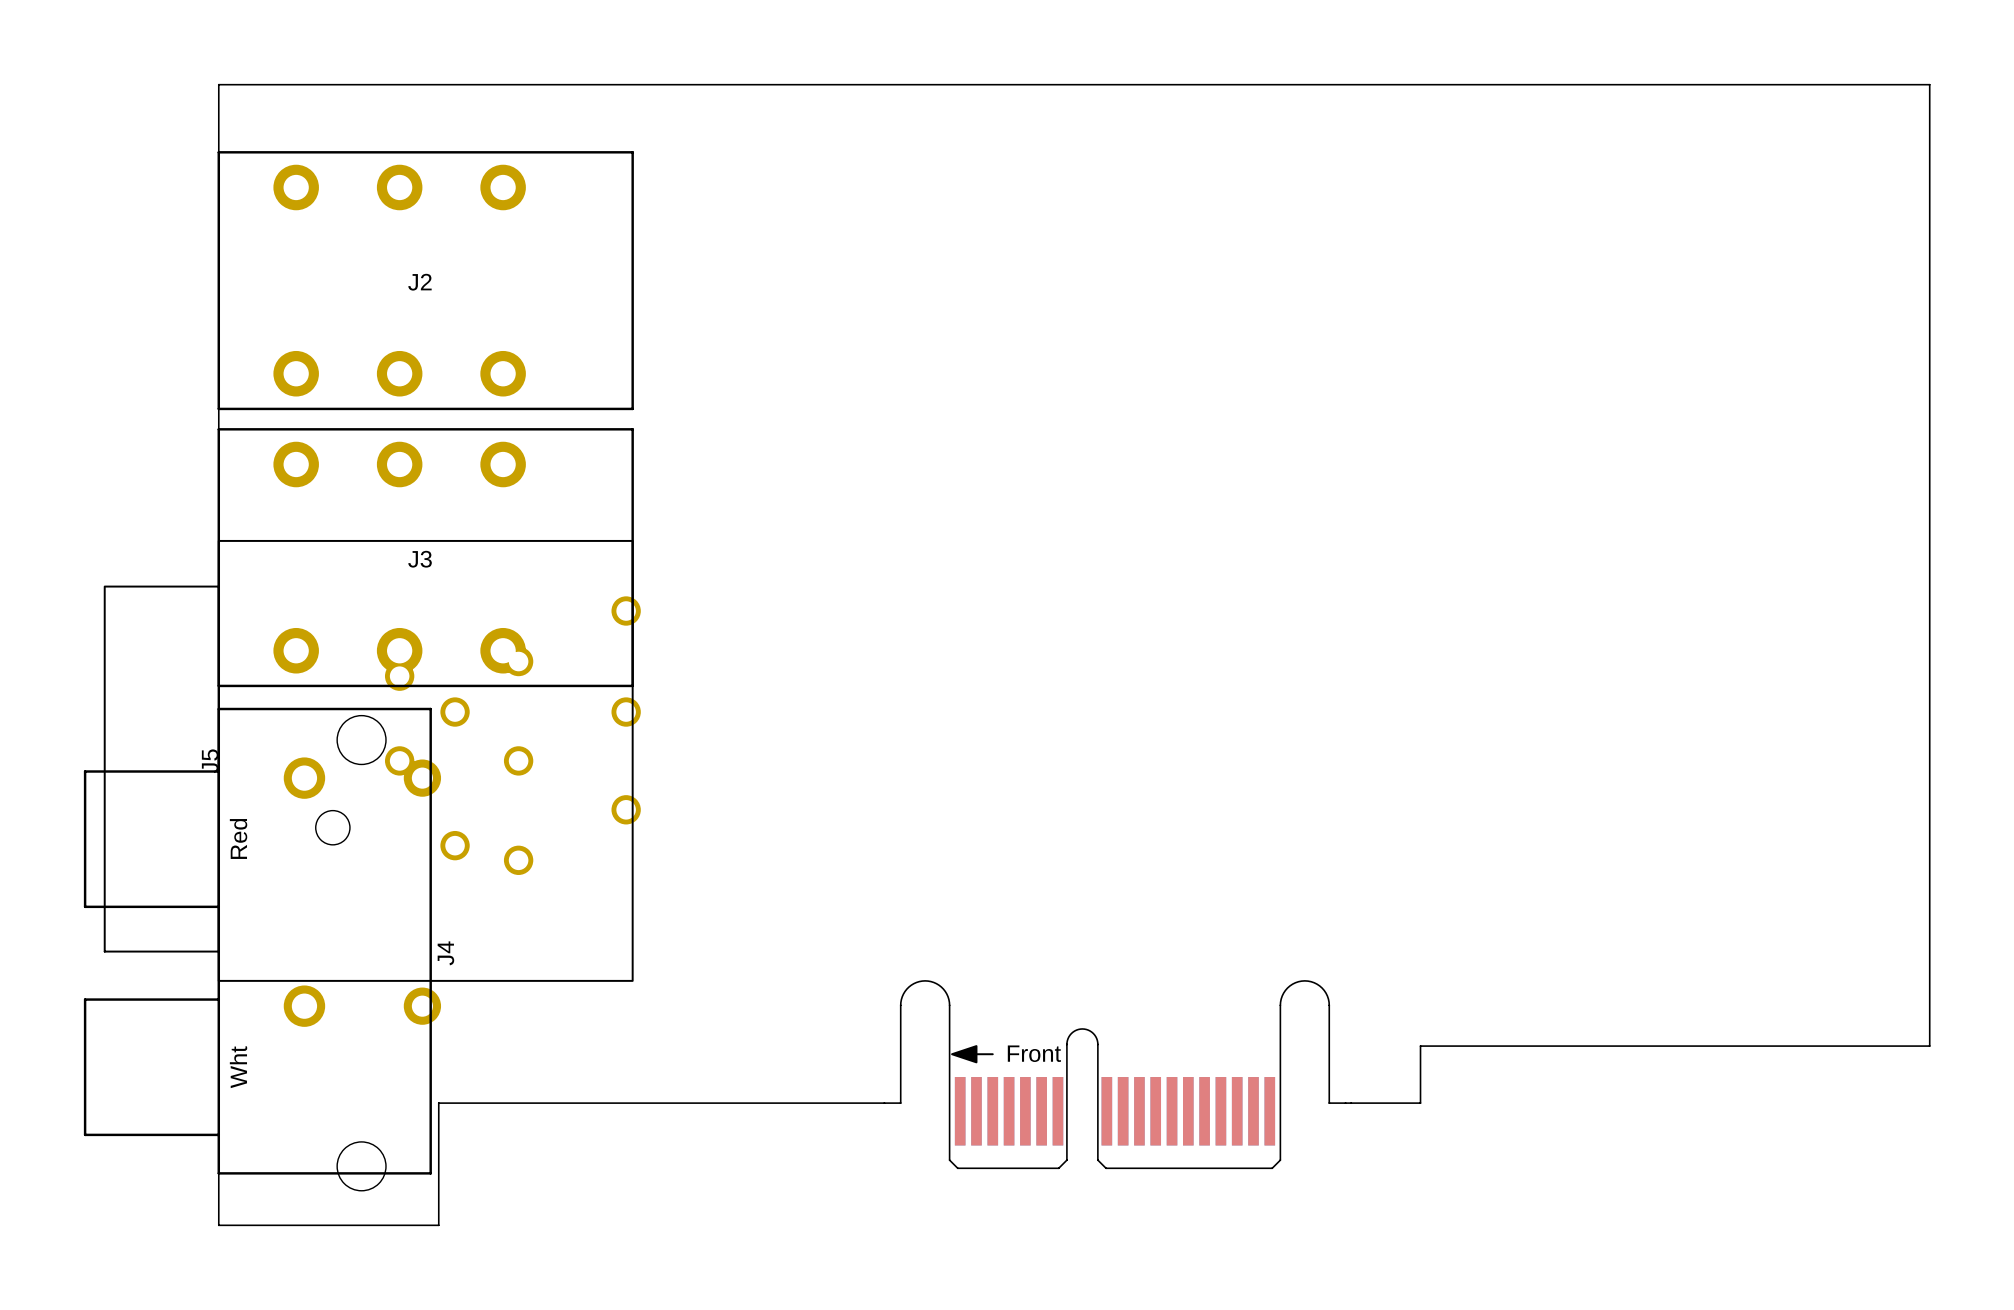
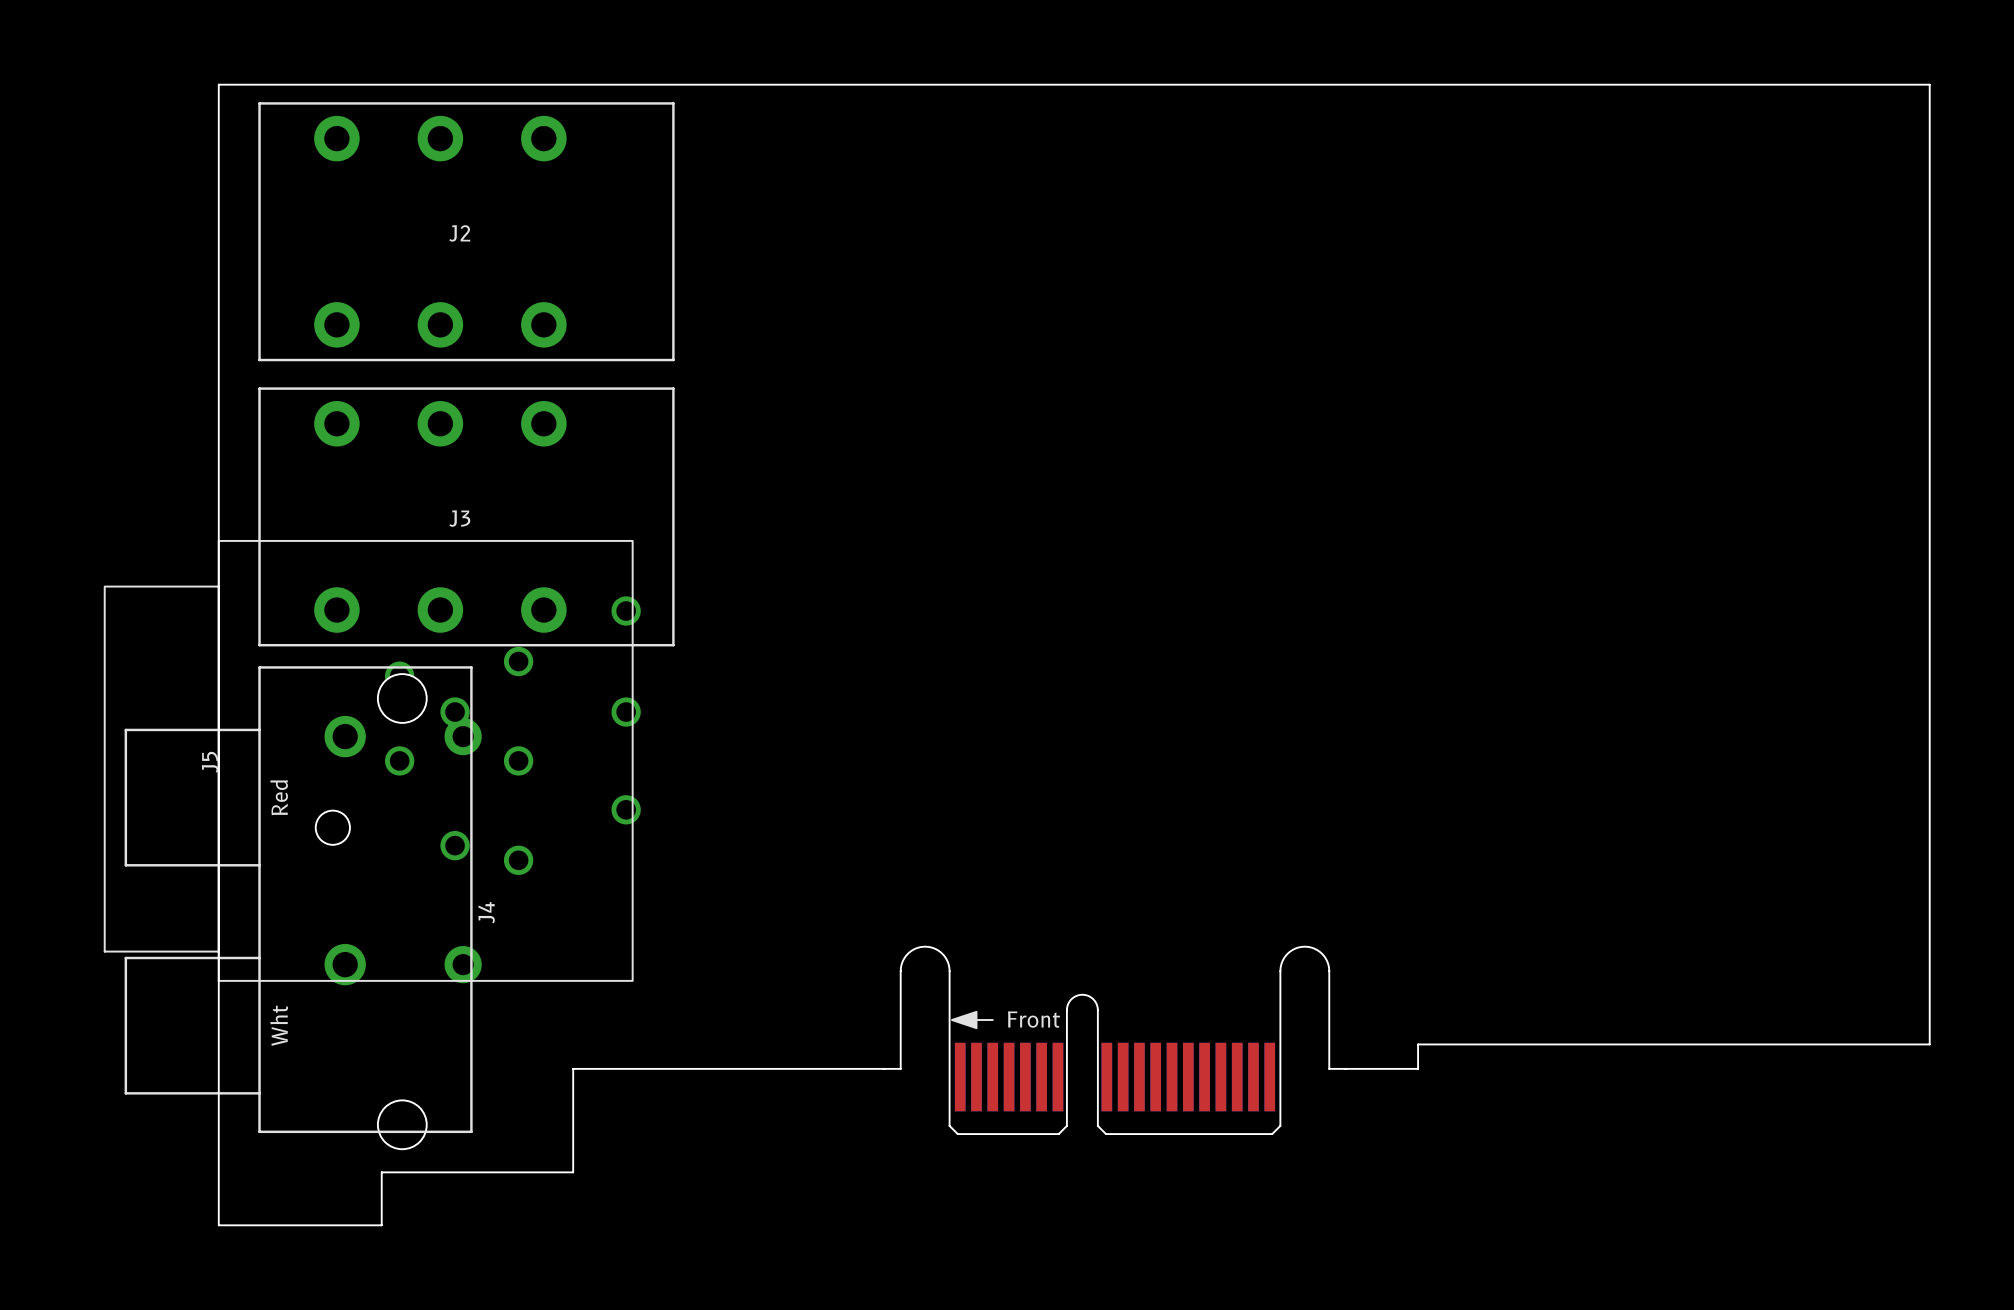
J2 position: (425, 280) -> (466, 231)
J3 position: (425, 557) -> (466, 516)
J4 position: (262, 949) -> (303, 907)
board edge: (1929, 1044) (1929, 1046) (1420, 1046) (1420, 1103) (1345, 1103) -> (1929, 1044) (1418, 1044) (1418, 1068) (1345, 1068)
part position: (1114, 1074) -> (1114, 1040)
board edge: (884, 1103) (438, 1103) (438, 1225) (381, 1225) -> (884, 1068) (573, 1068) (573, 1172) (381, 1172) (381, 1225)

